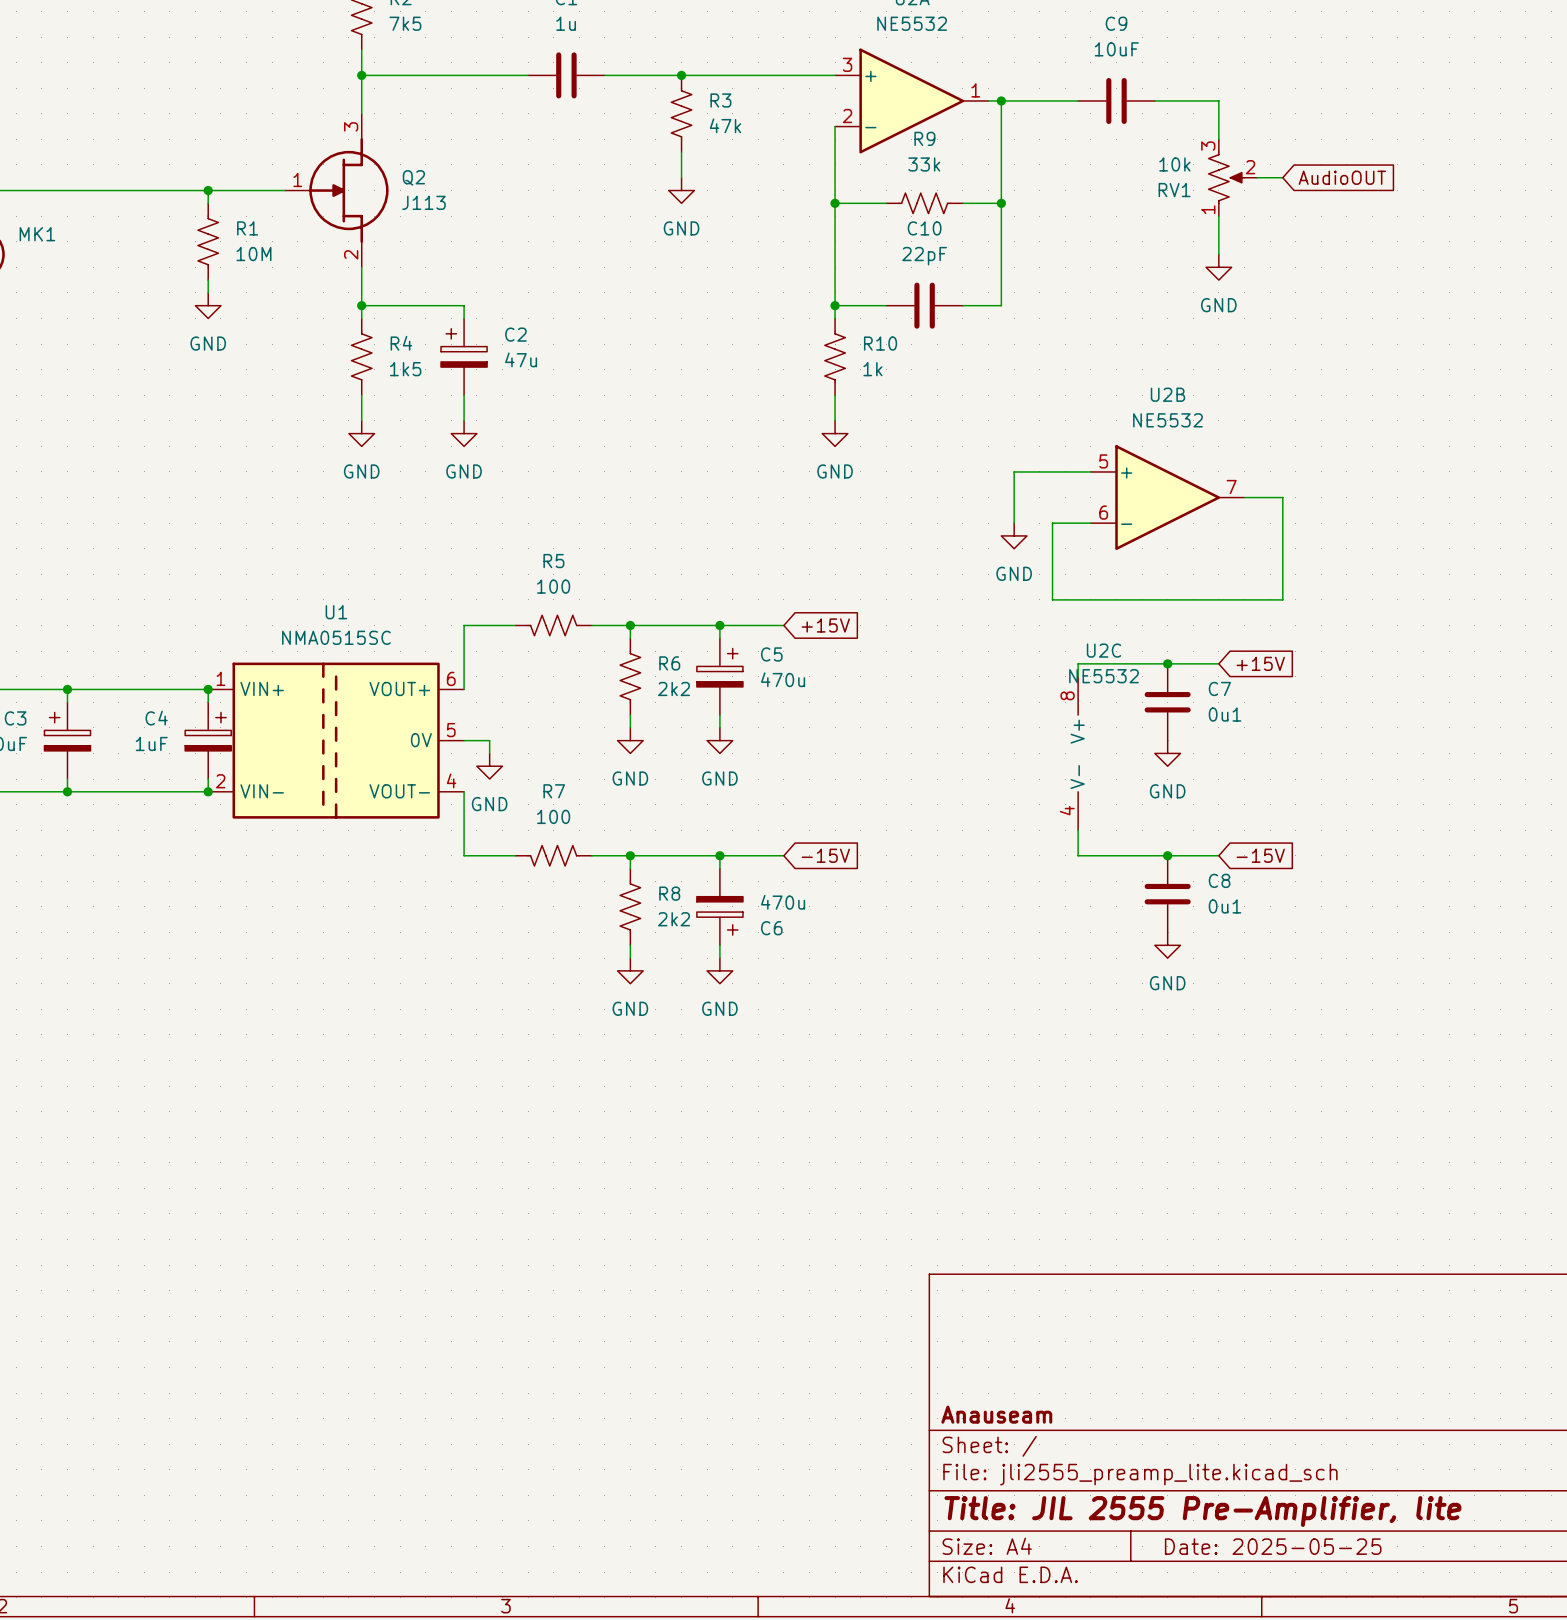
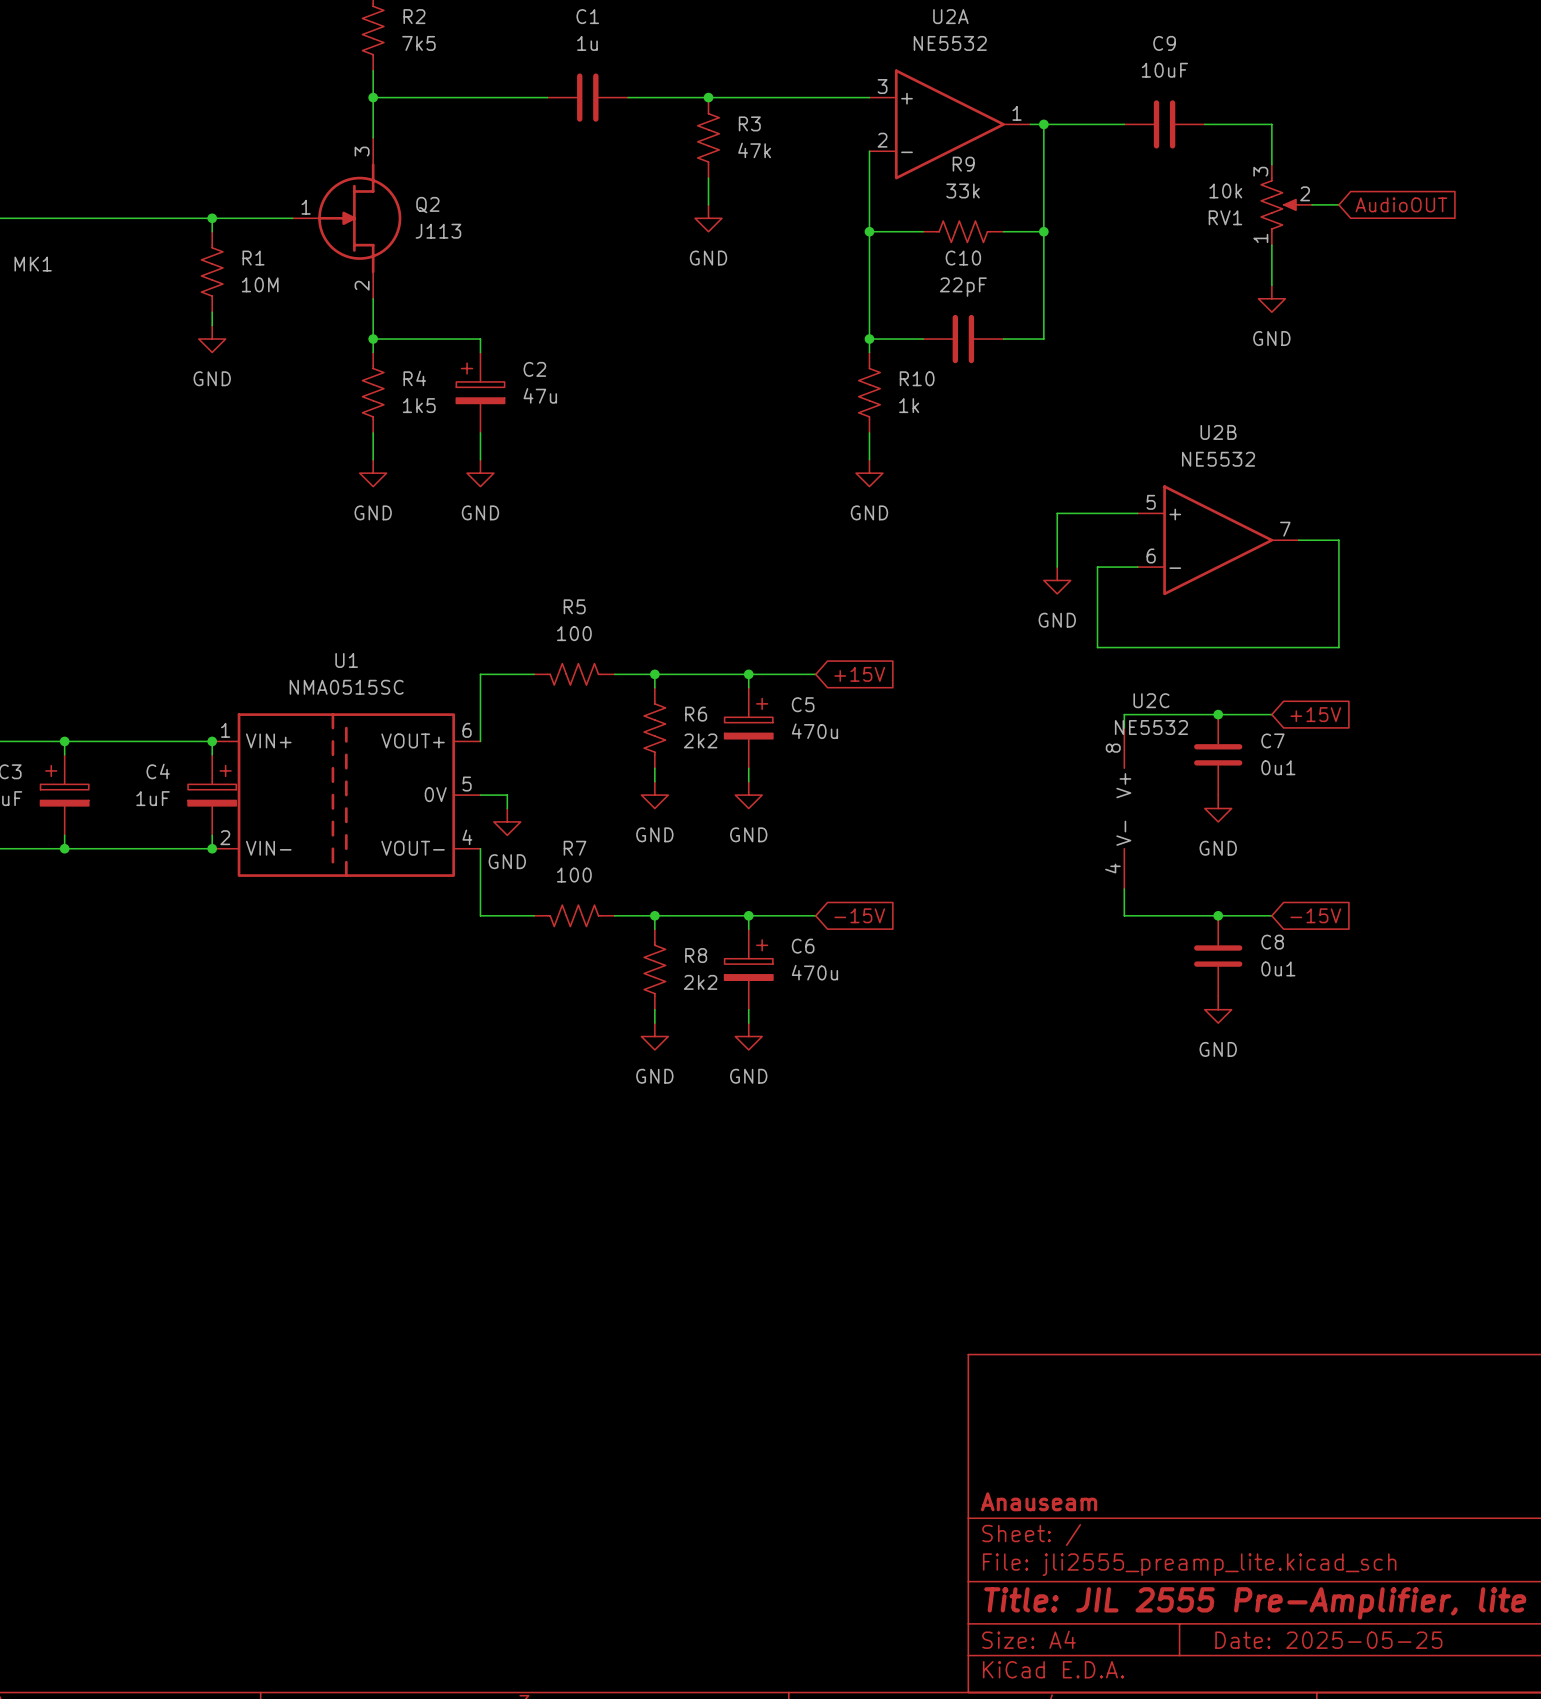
C6 flip: as is (719, 915) -> up-down (748, 960)

